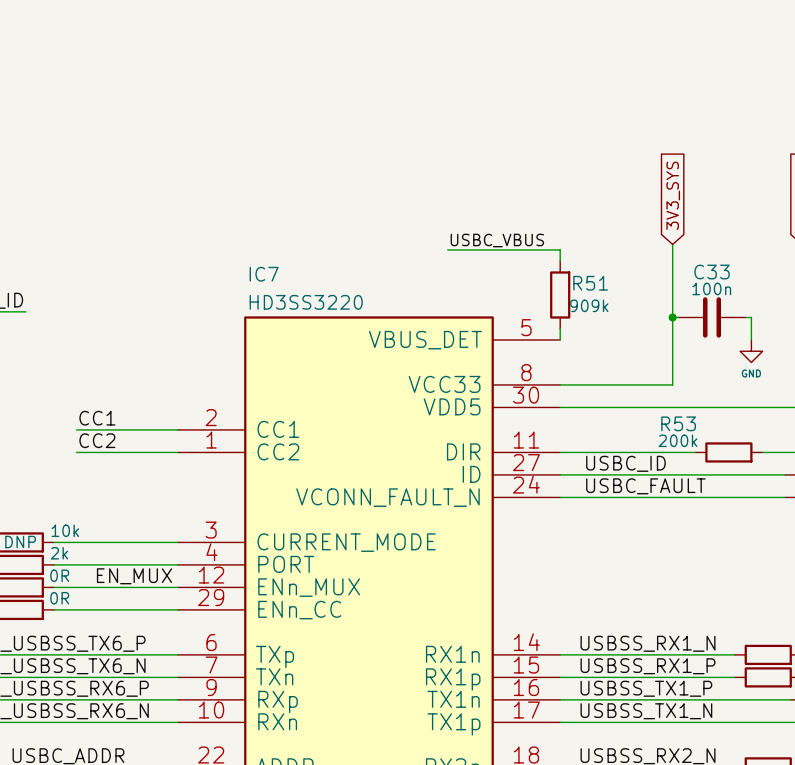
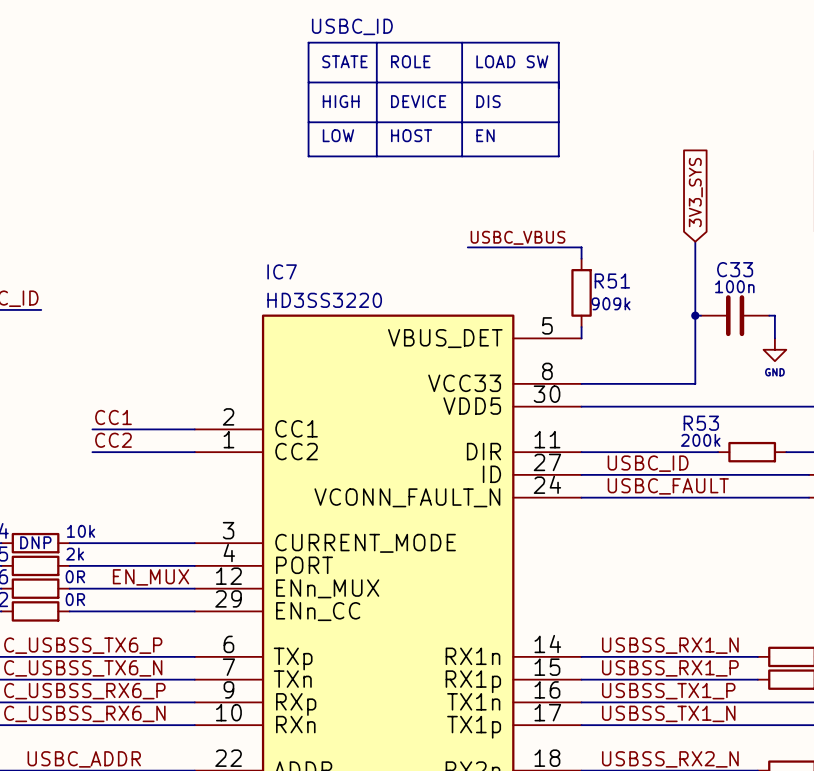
text: none -> USBC_ID (352, 26)
line: none -> (308, 42) (308, 156) (558, 156) (558, 42) (308, 42)
line: none -> (376, 42) (376, 156)
line: none -> (462, 42) (462, 156)
text: none -> STATE (344, 61)
text: none -> ROLE (410, 61)
text: none -> LOAD SW (512, 61)
line: none -> (308, 82) (558, 82)
text: none -> HIGH (341, 101)
text: none -> DEVICE (418, 101)
text: none -> DIS (488, 101)
line: none -> (308, 122) (558, 122)
text: none -> LOW (338, 135)
text: none -> HOST (411, 135)
text: none -> EN (485, 135)

